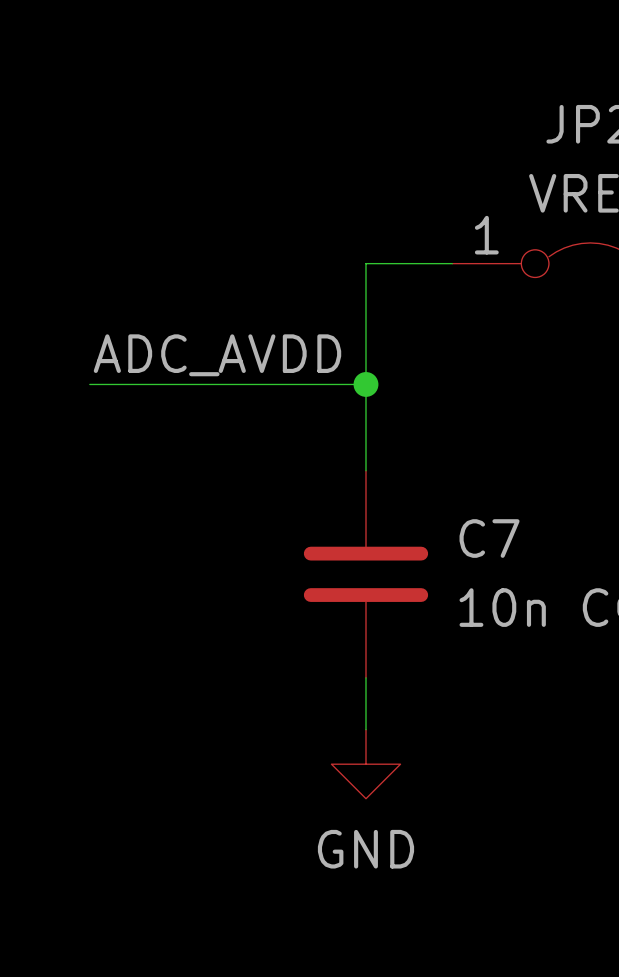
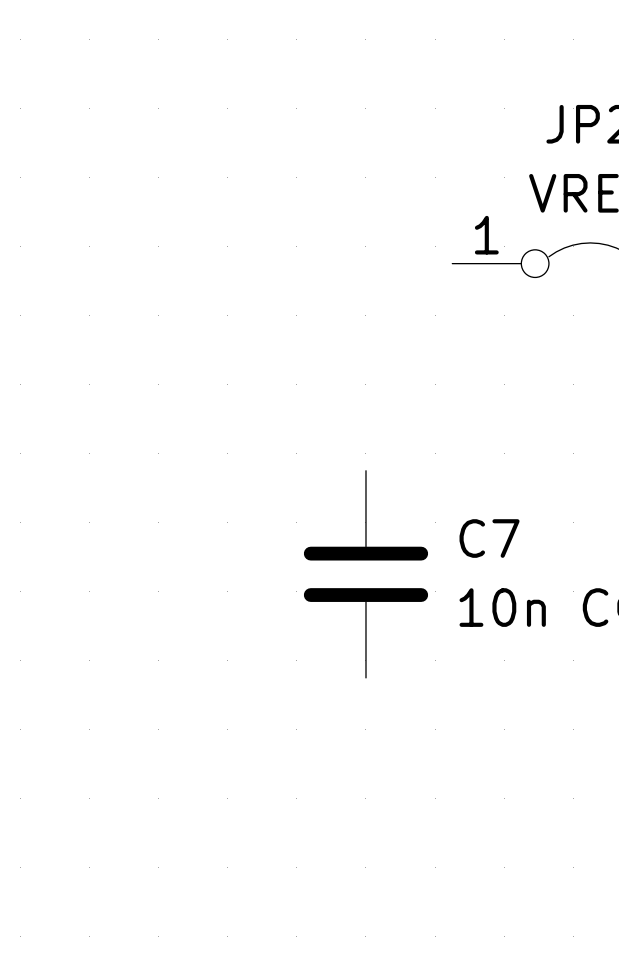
wire: (452, 263) (365, 263) (365, 470) -> none
label: ADC_AVDD (217, 355) -> none
wire: (89, 384) (365, 384) -> none
junction: (365, 384) -> none
wire: (365, 677) (365, 729) -> none
power symbol: GND (365, 764) -> none

